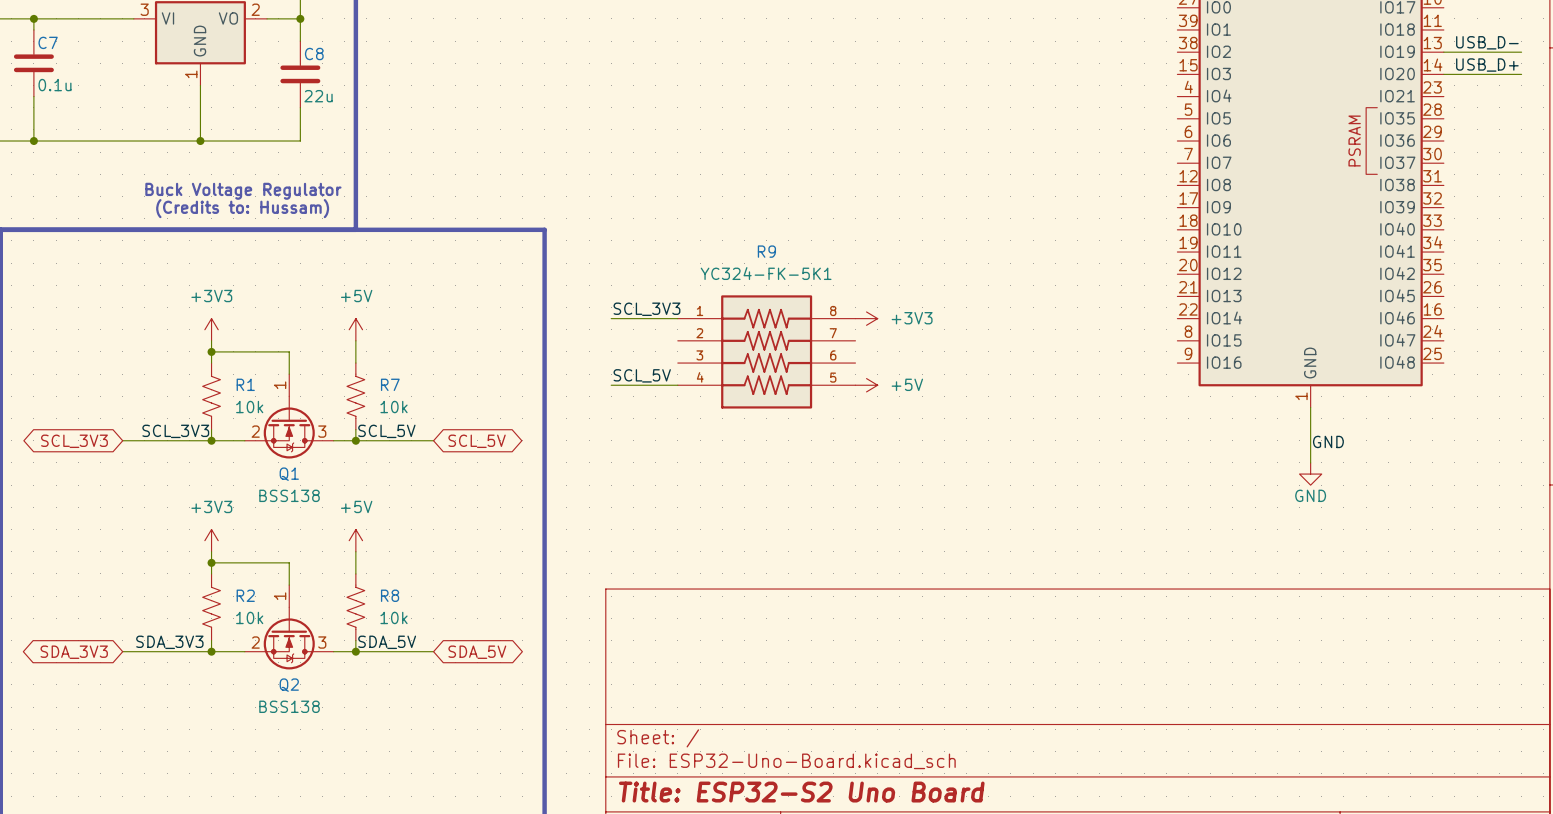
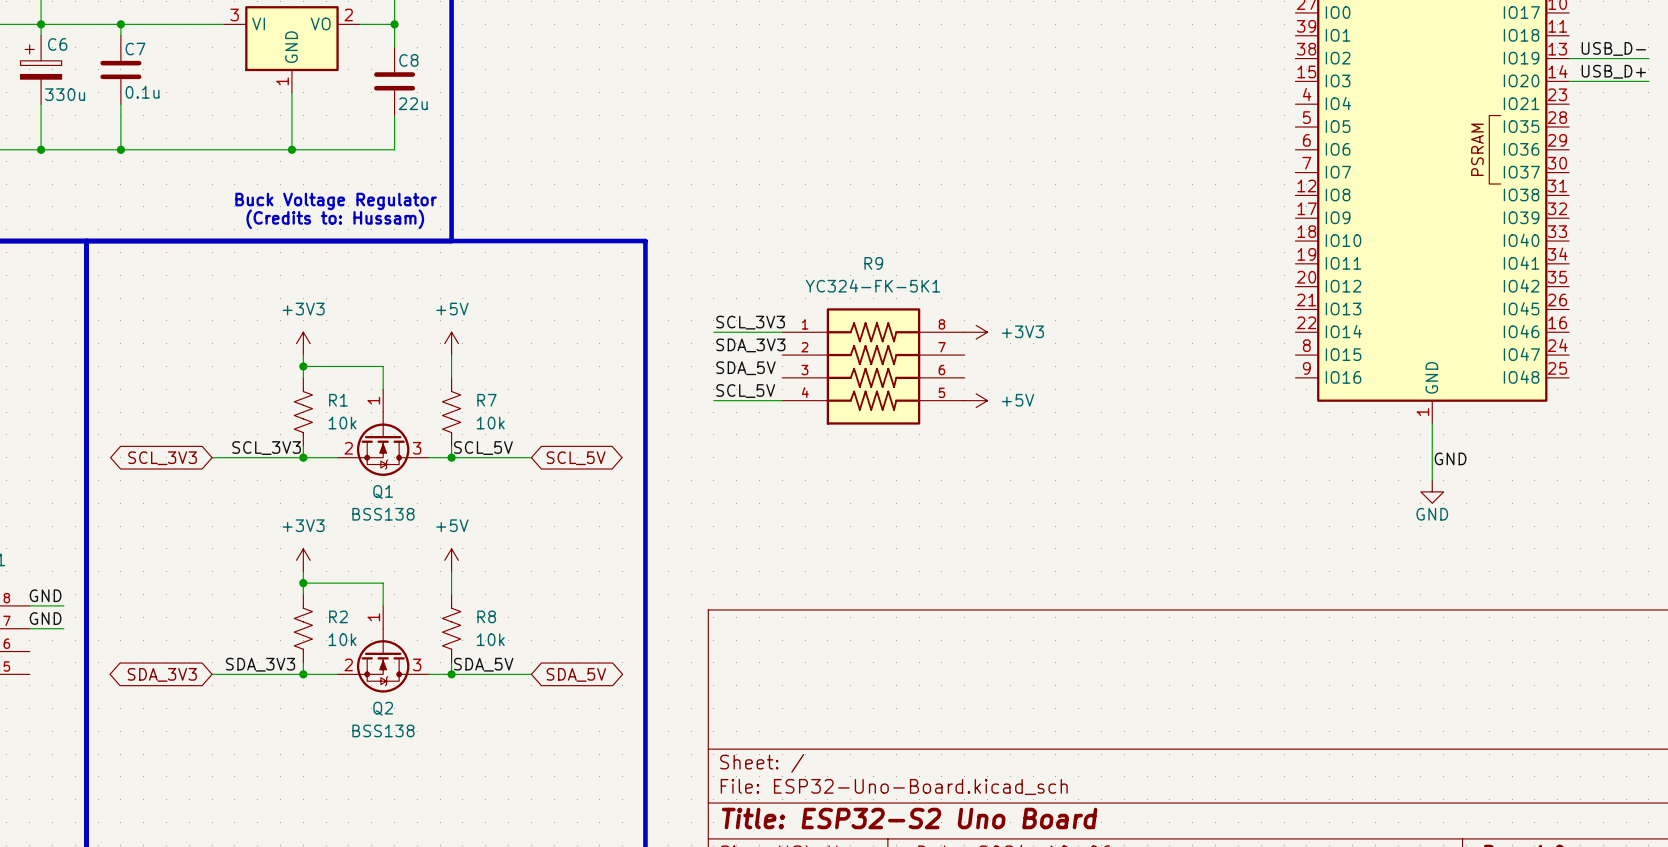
label: none -> SDA_3V3 (750, 345)
label: none -> SDA_5V (745, 368)

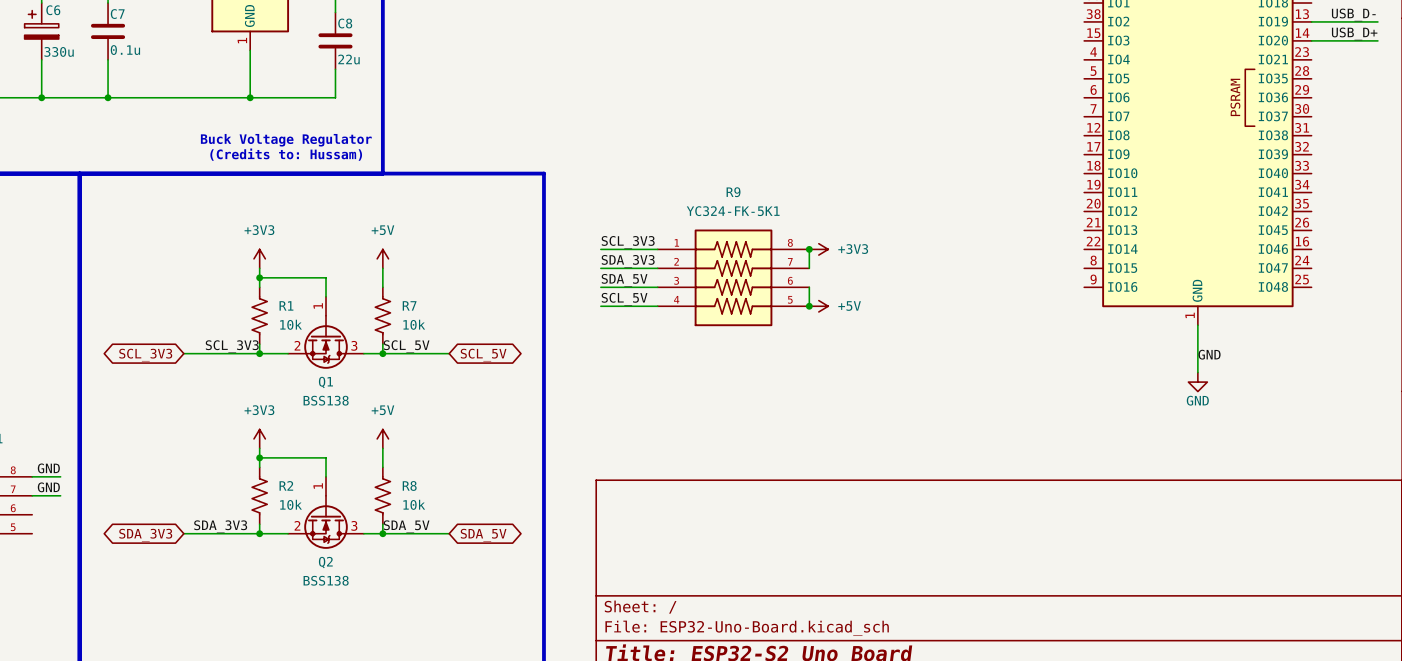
wire: none -> (809, 249) (809, 268)
junction: none -> (809, 249)
wire: none -> (600, 268) (657, 268)
wire: none -> (600, 287) (657, 287)
wire: none -> (809, 287) (809, 306)
junction: none -> (809, 306)

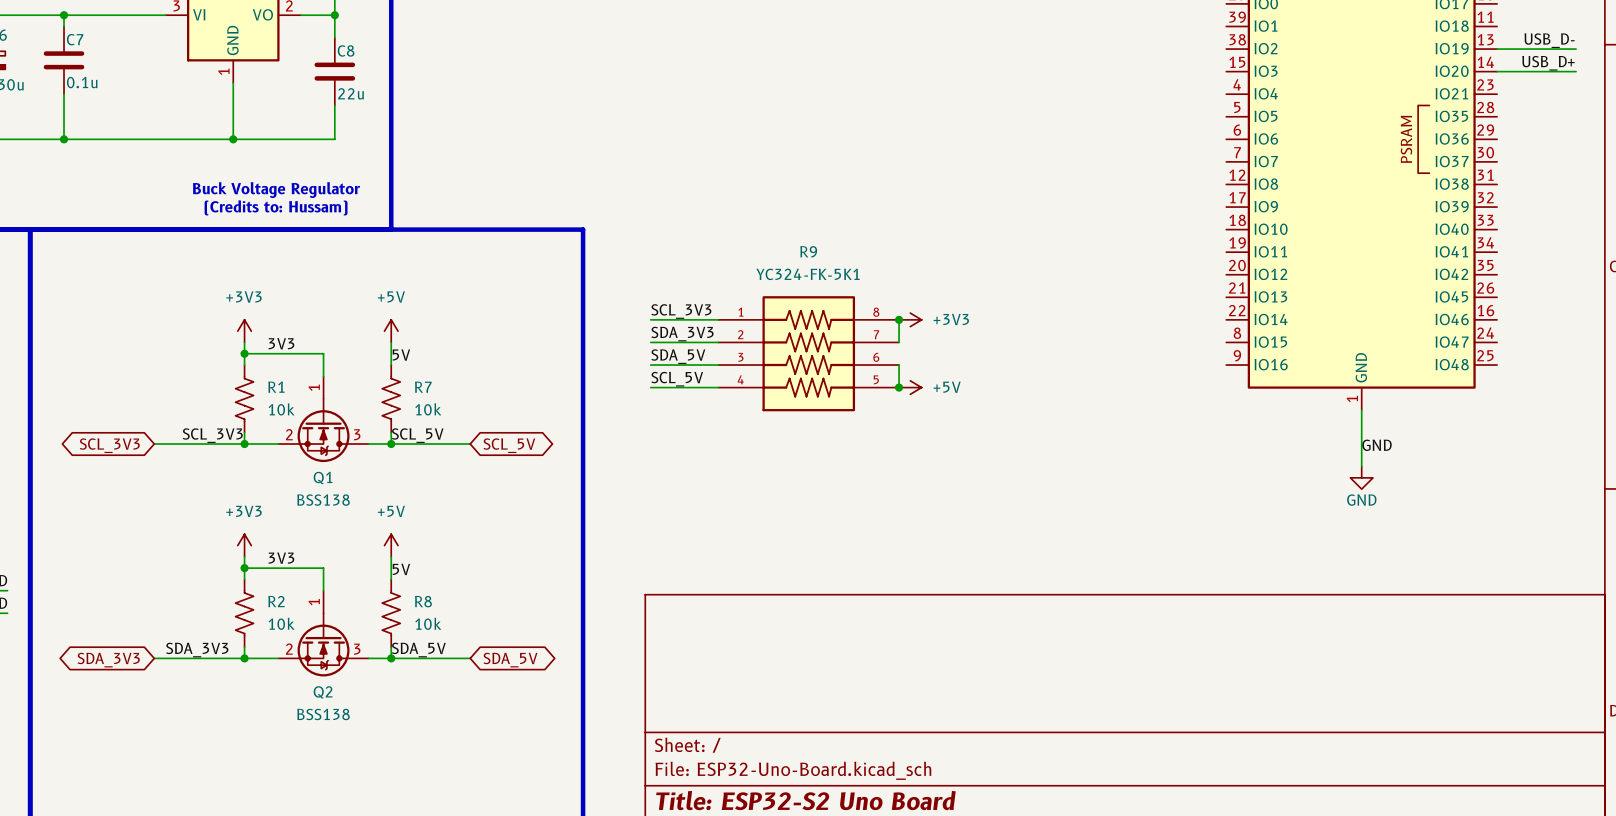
label: none -> 3V3 (281, 343)
label: none -> 5V (401, 355)
label: none -> 3V3 (281, 558)
label: none -> 5V (401, 569)

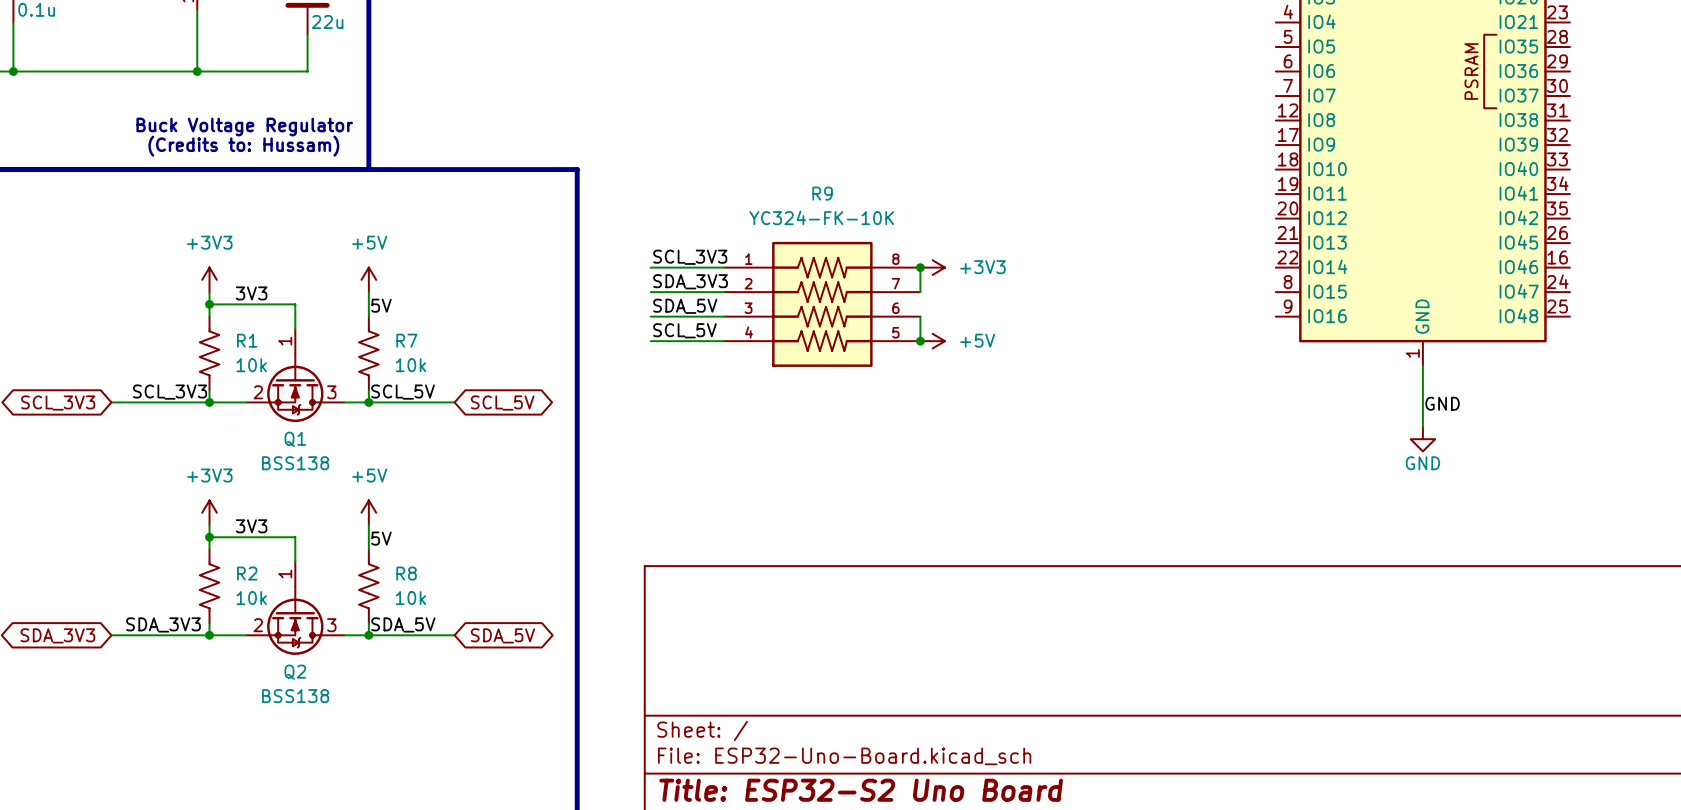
R9 value: YC324-FK-5K1 (808, 274) -> YC324-FK-10K (821, 217)

